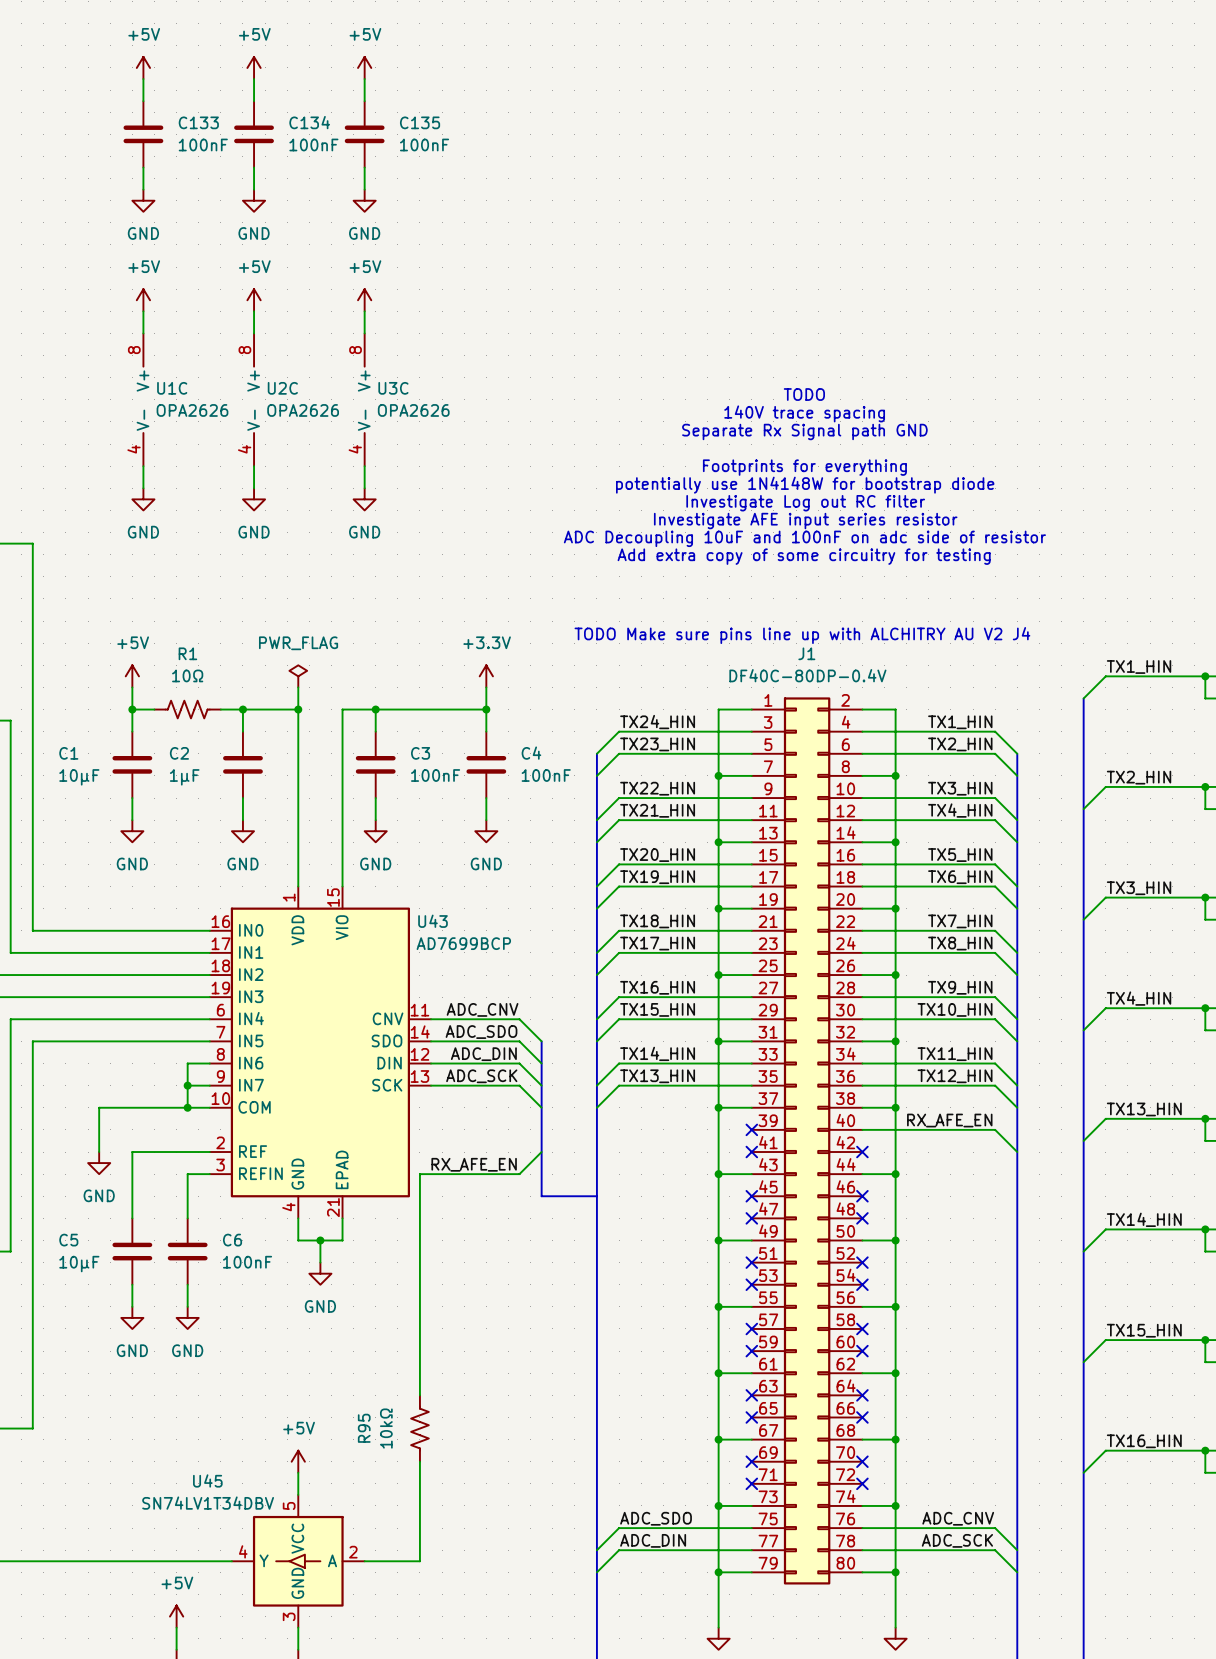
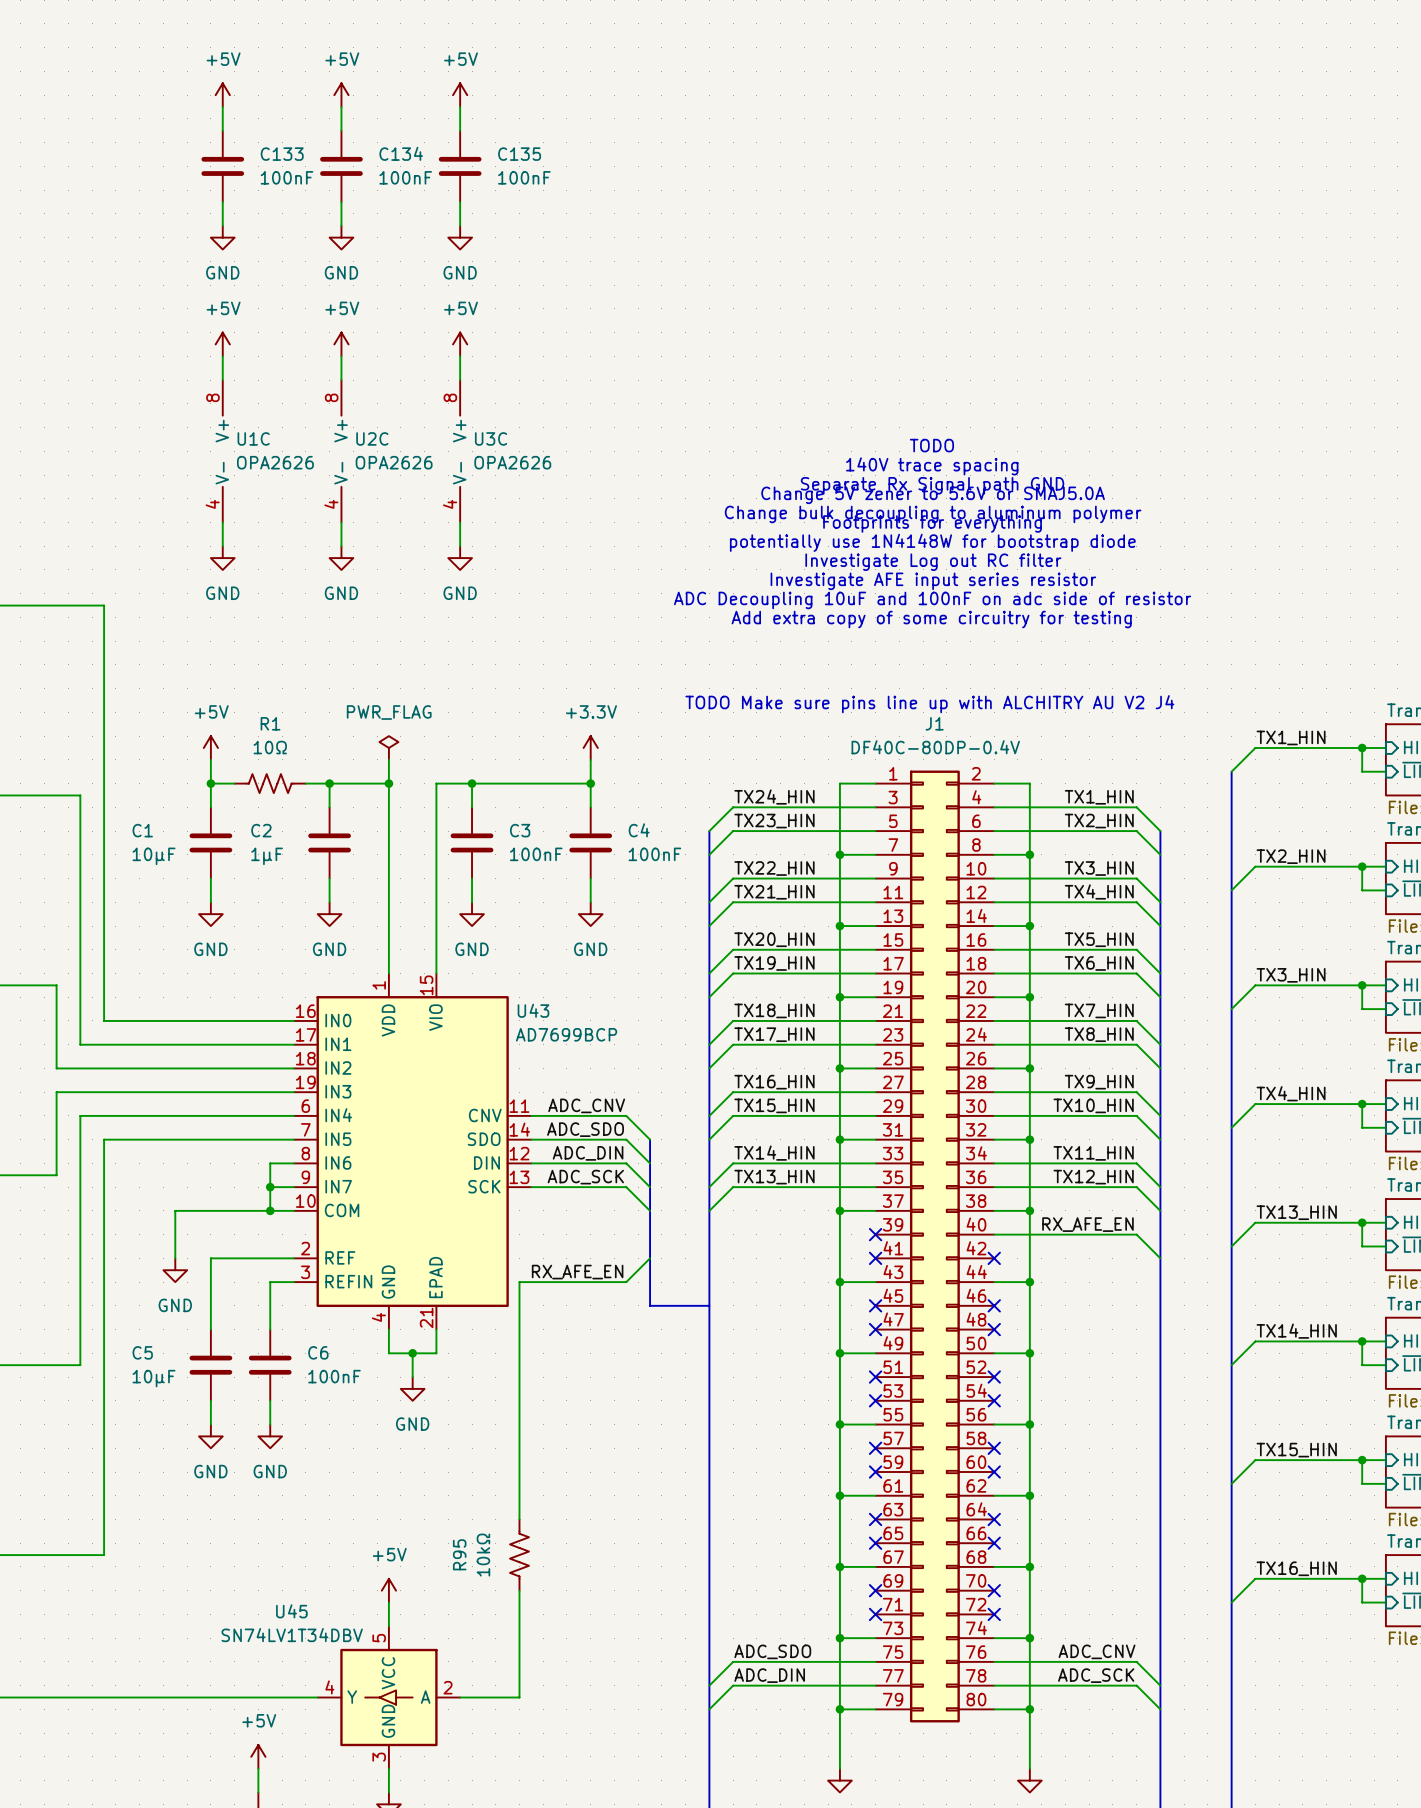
text: none -> Change 5V zener to 5.6V or SMAJ5.0A (933, 495)
text: none -> Change bulk decoupling to aluminum polymer (933, 514)

